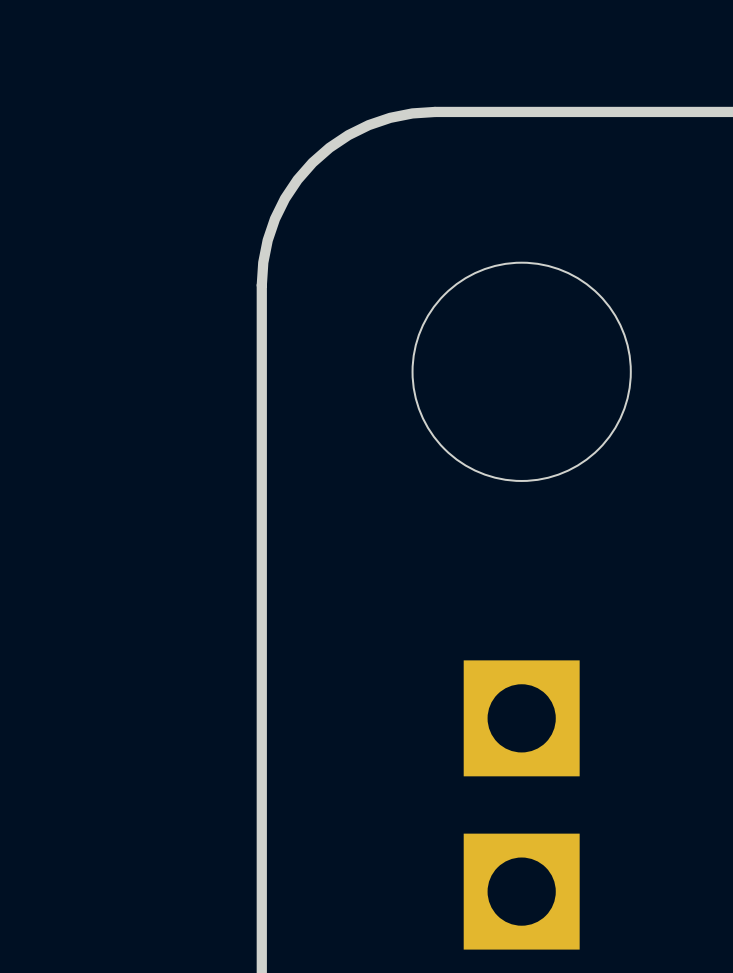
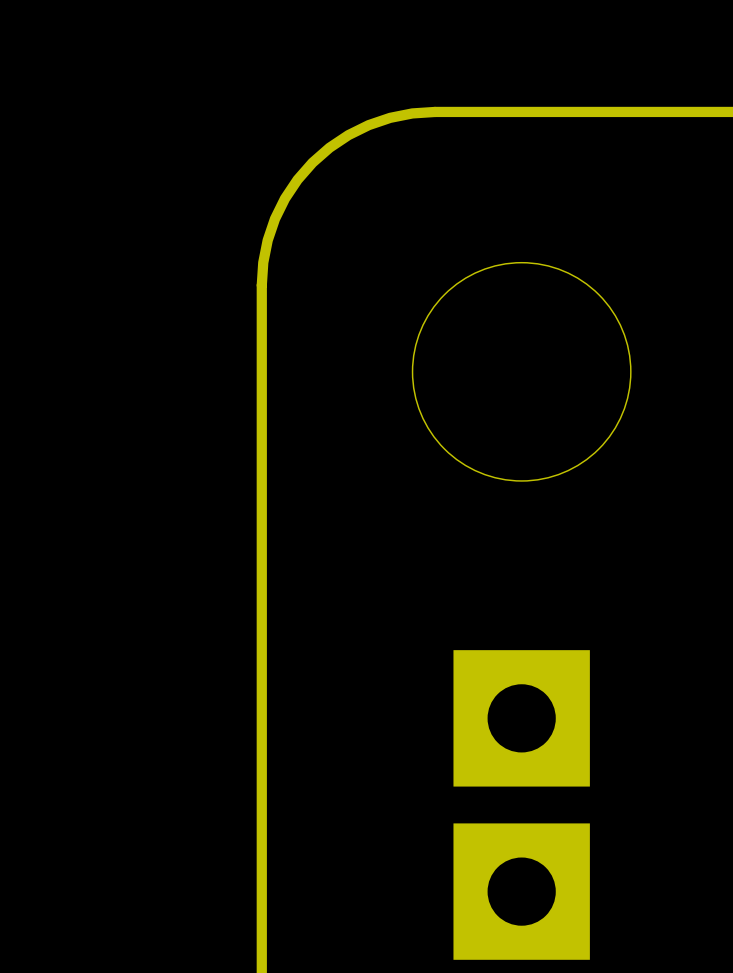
part footprint: [463, 660, 580, 777] -> [453, 650, 590, 787]
part footprint: [463, 833, 580, 950] -> [453, 823, 590, 960]

